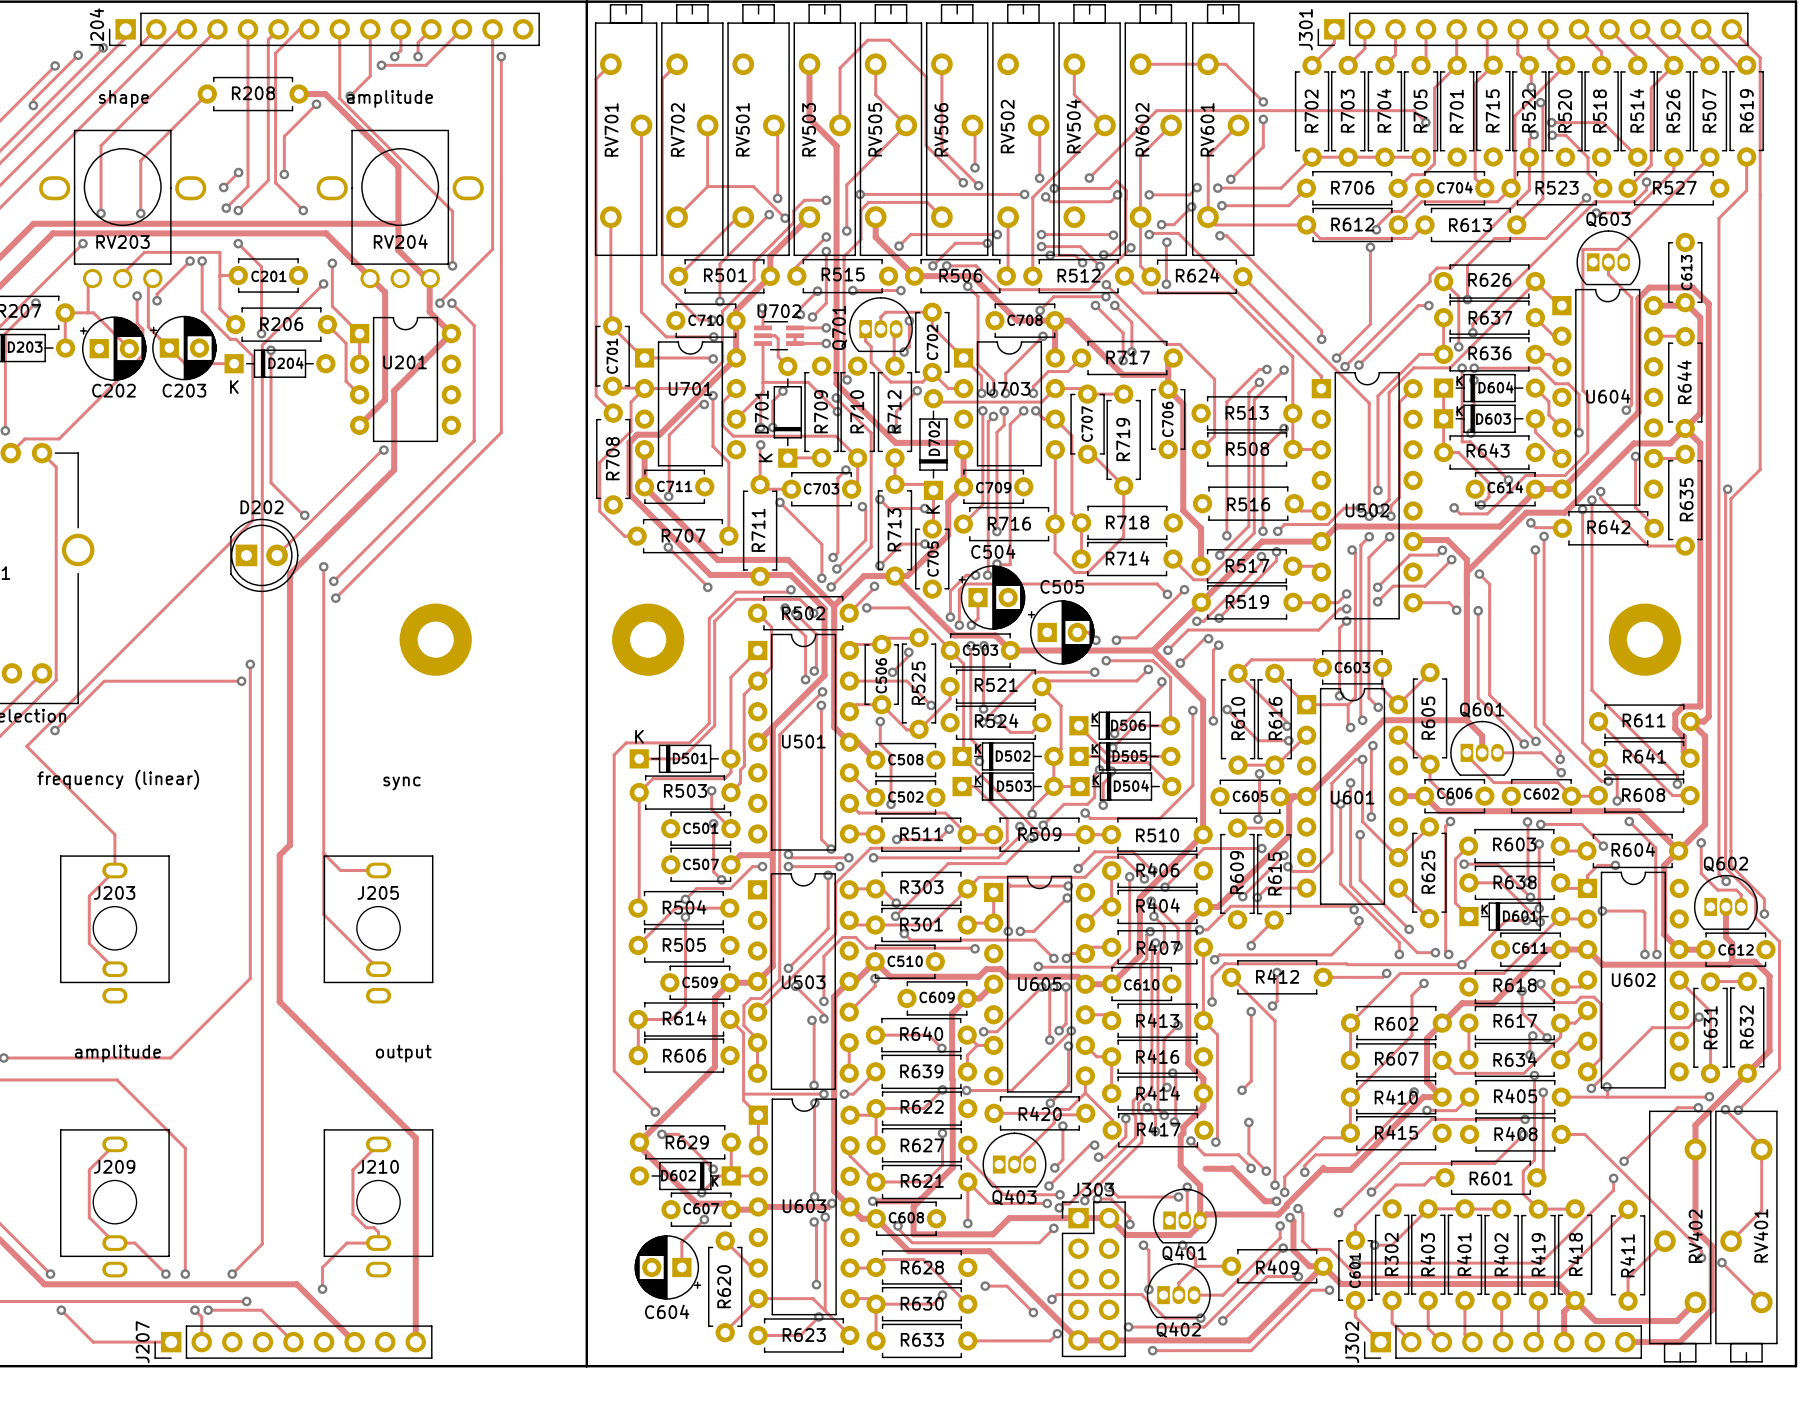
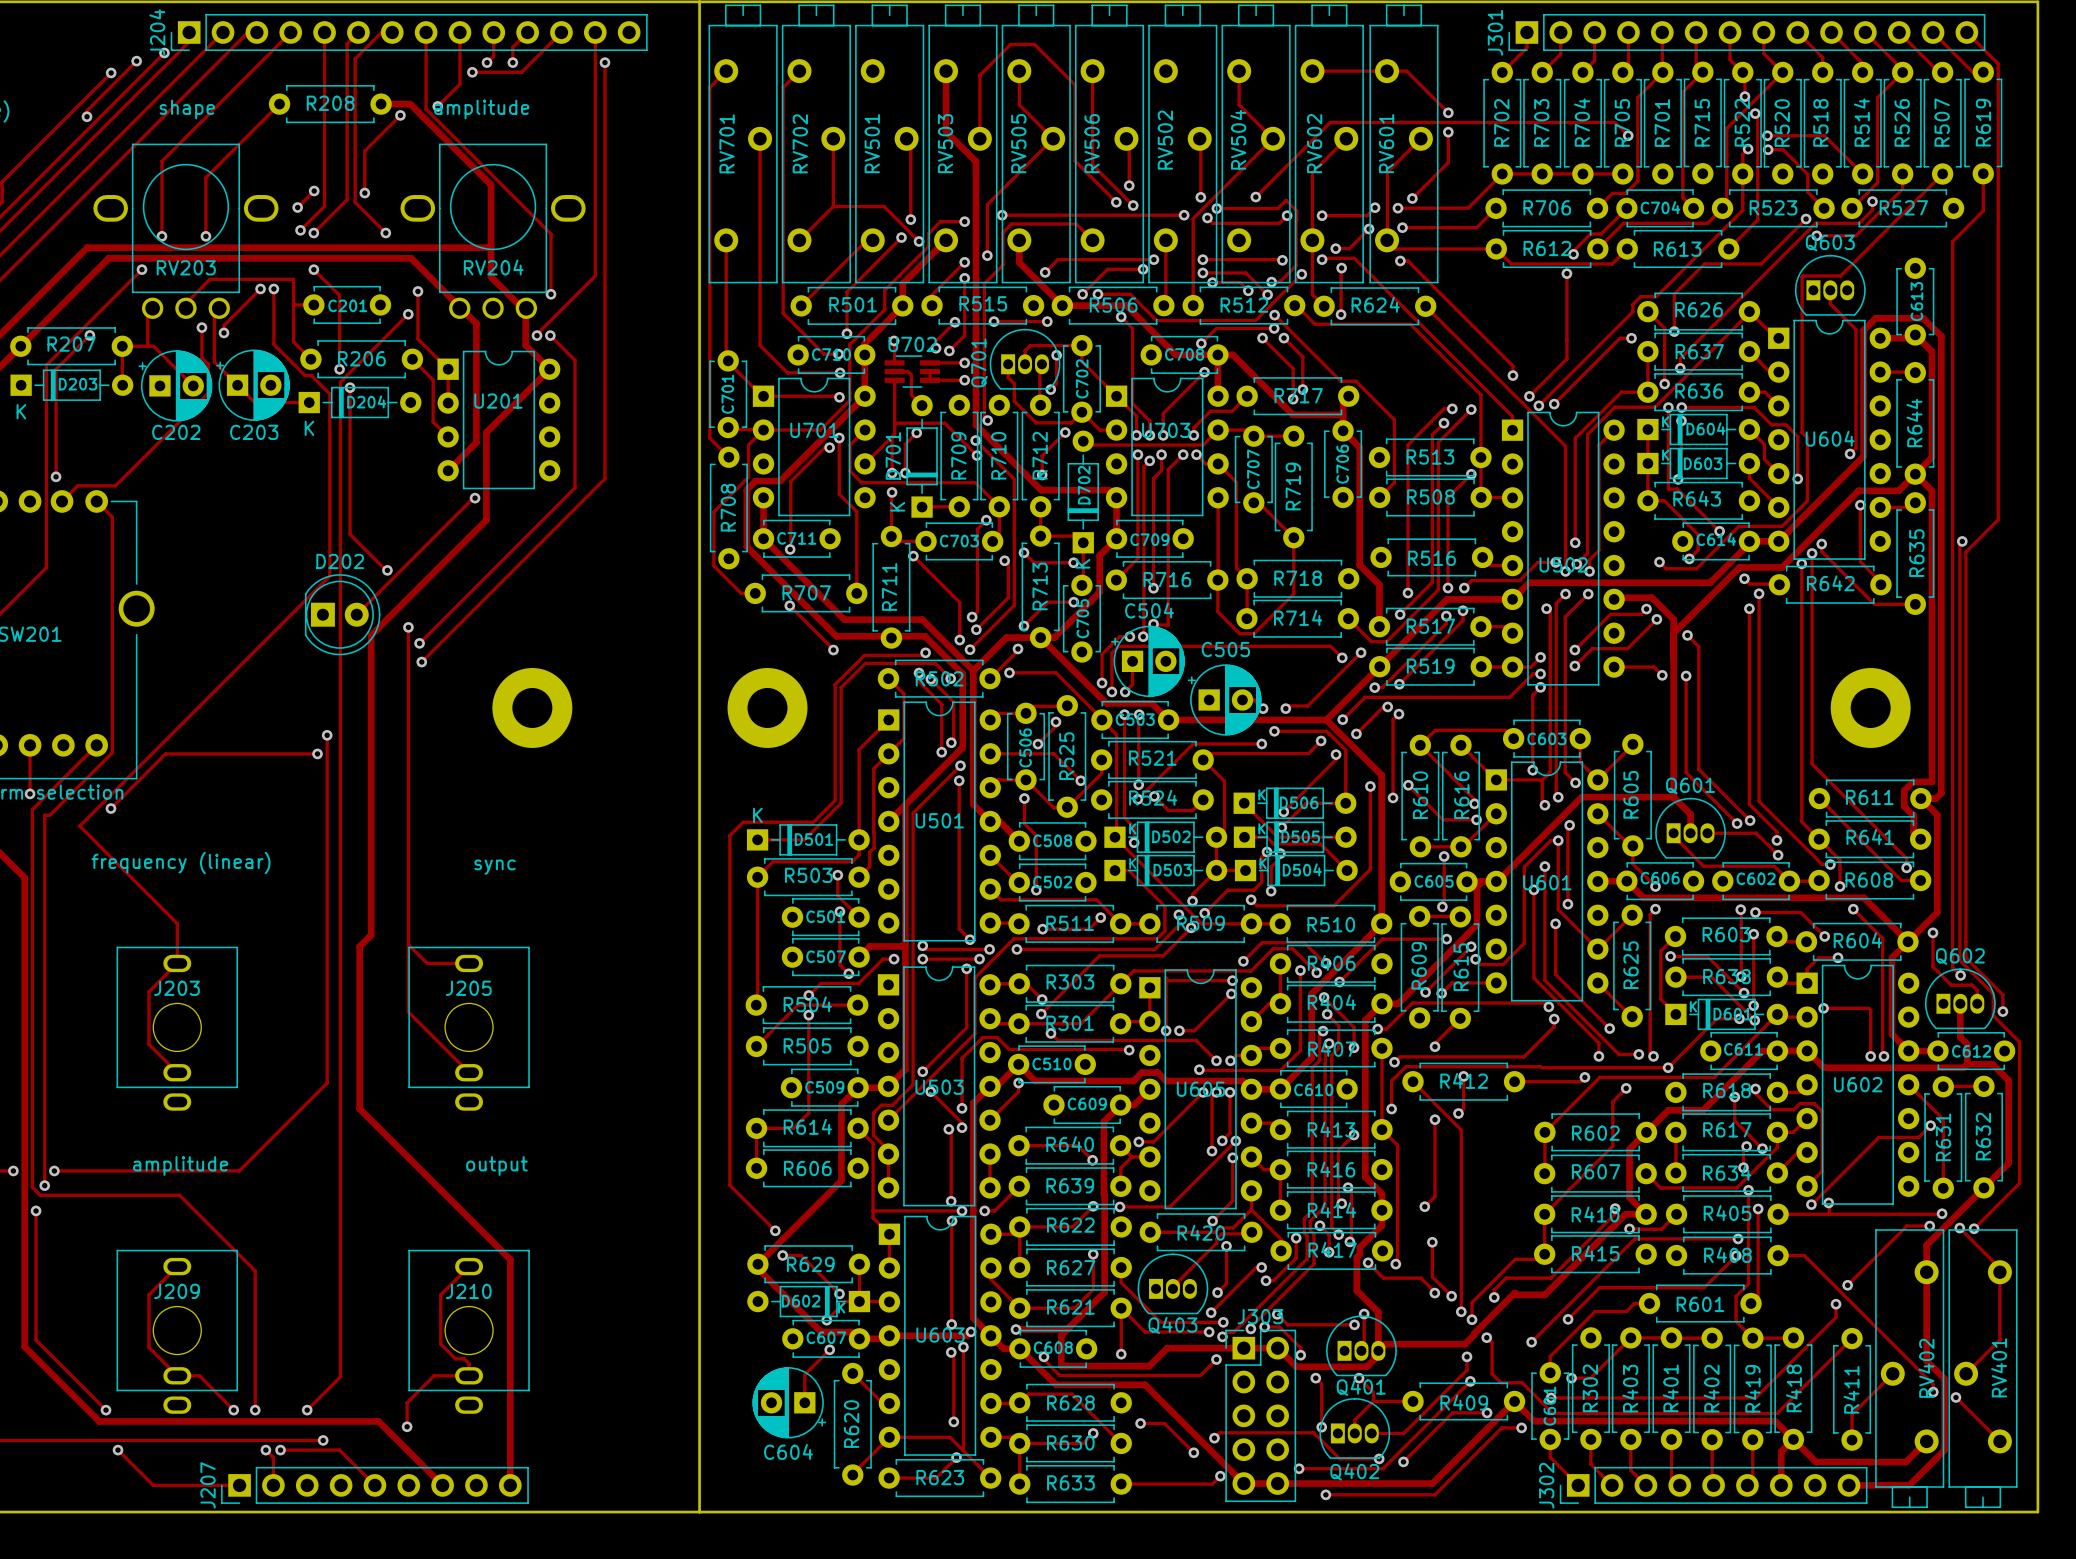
track: (1205, 1168) (1232, 1168) (1265, 1201) (1276, 1201) -> none
via: (1276, 1201) -> none
track: (1289, 1217) (1293, 1221) (1293, 1250) (1309, 1266) (1323, 1266) -> none
via: (1289, 1217) -> none

